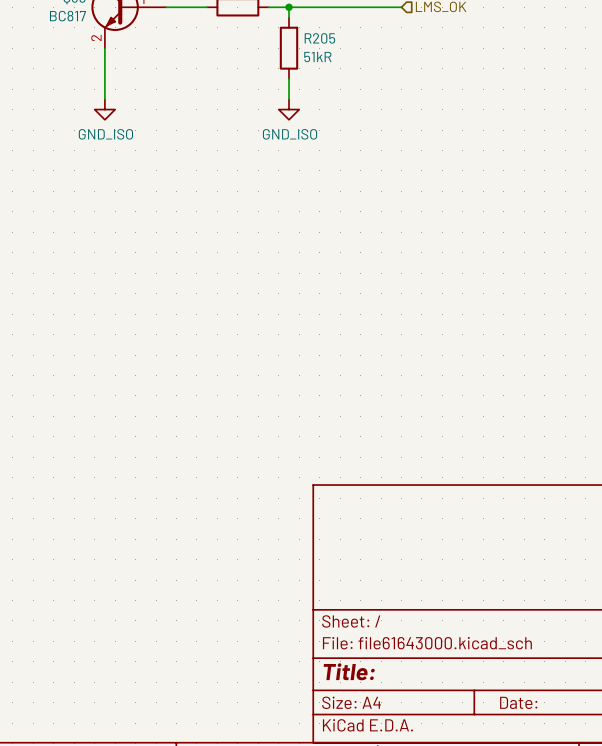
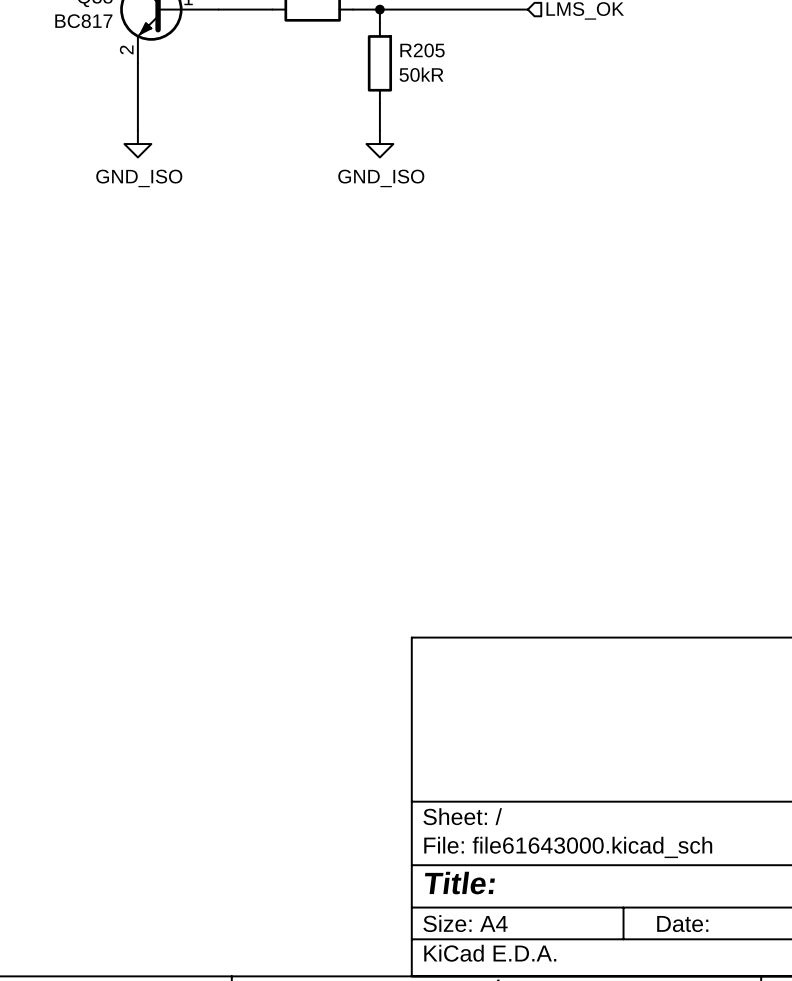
R205 value: 51kR (317, 57) -> 50kR (421, 74)

